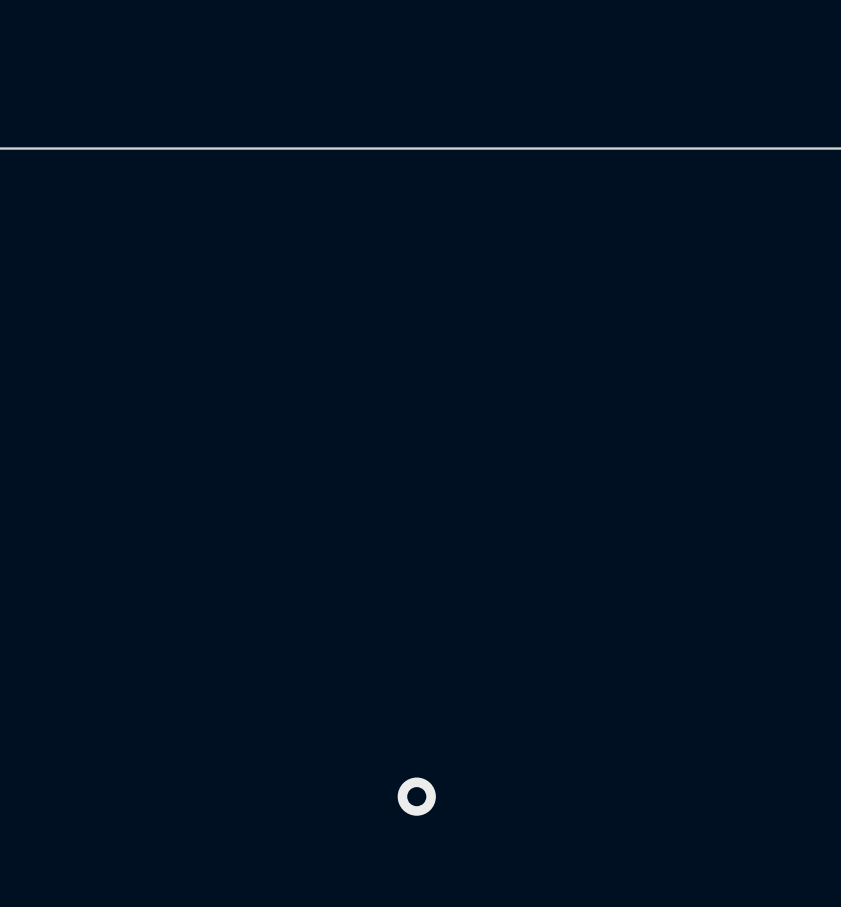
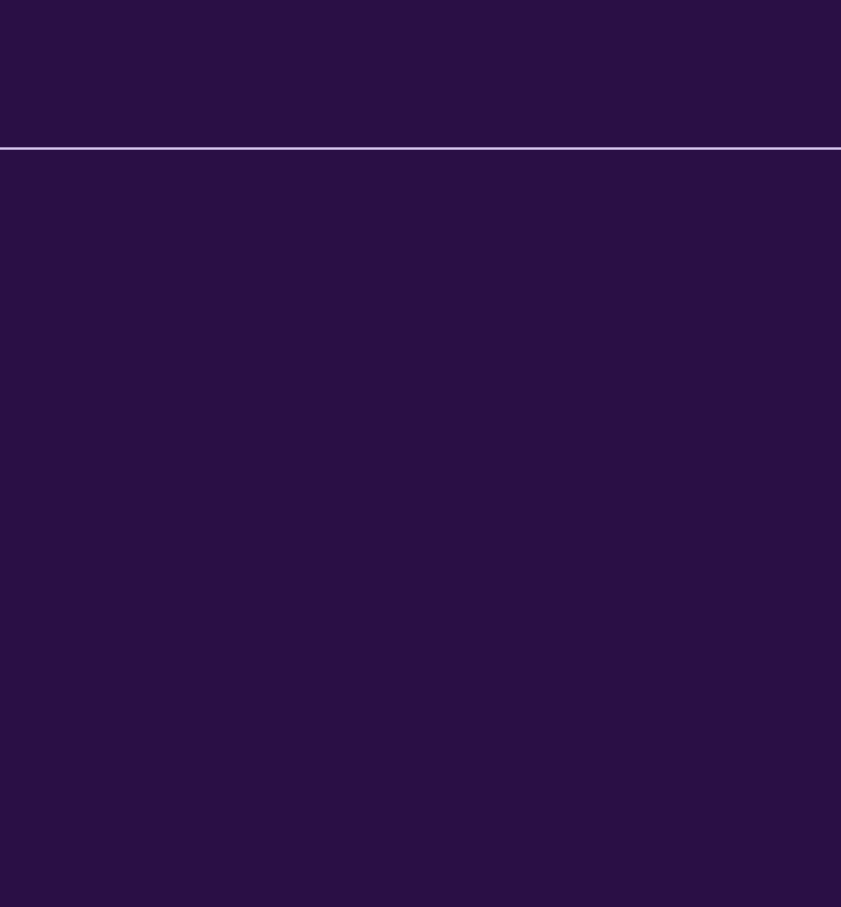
via: (416, 796) -> none

